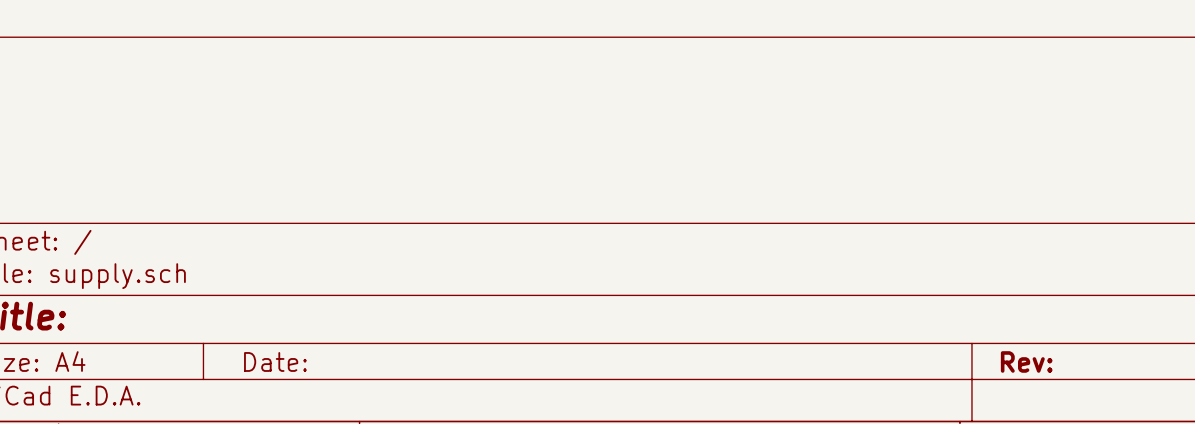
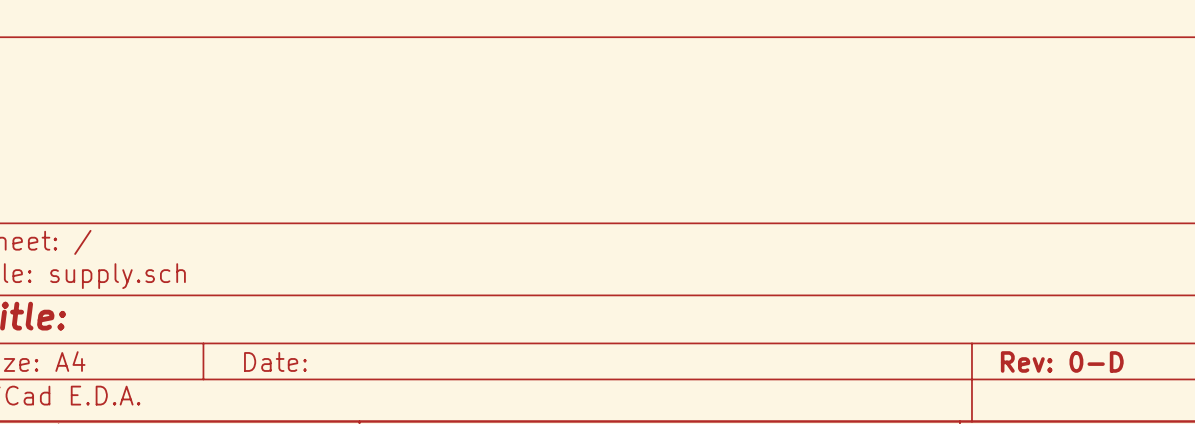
title block: Rev: (1026, 361) -> Rev: 0-D (1062, 361)

